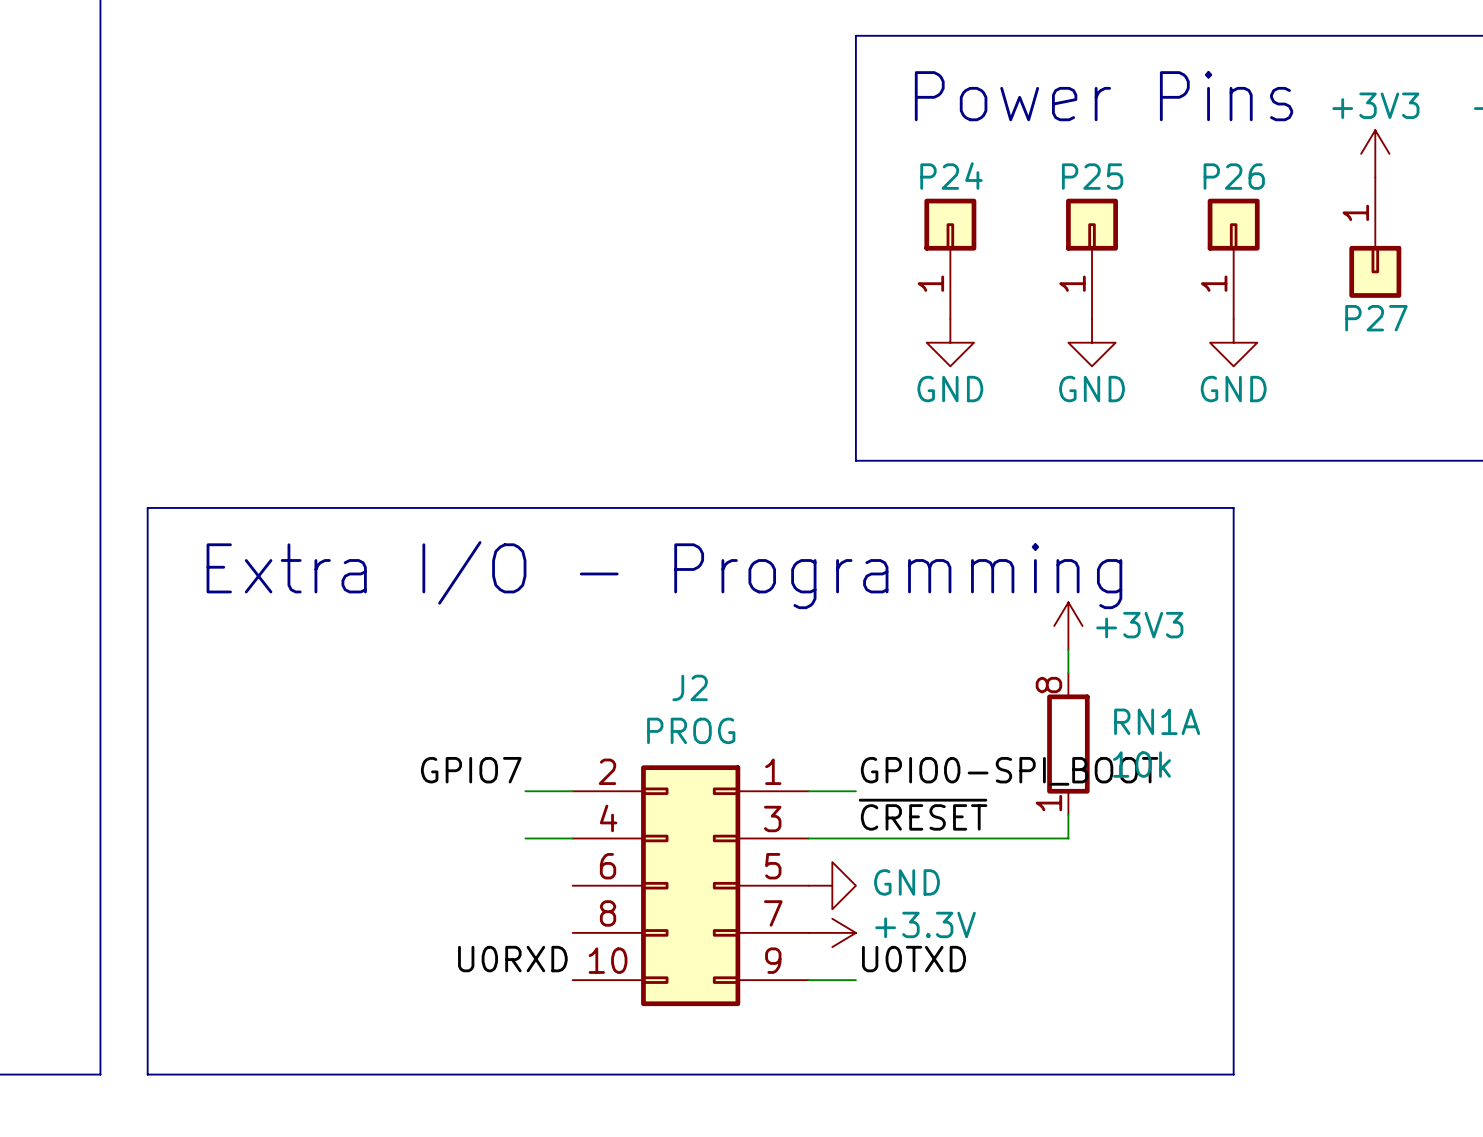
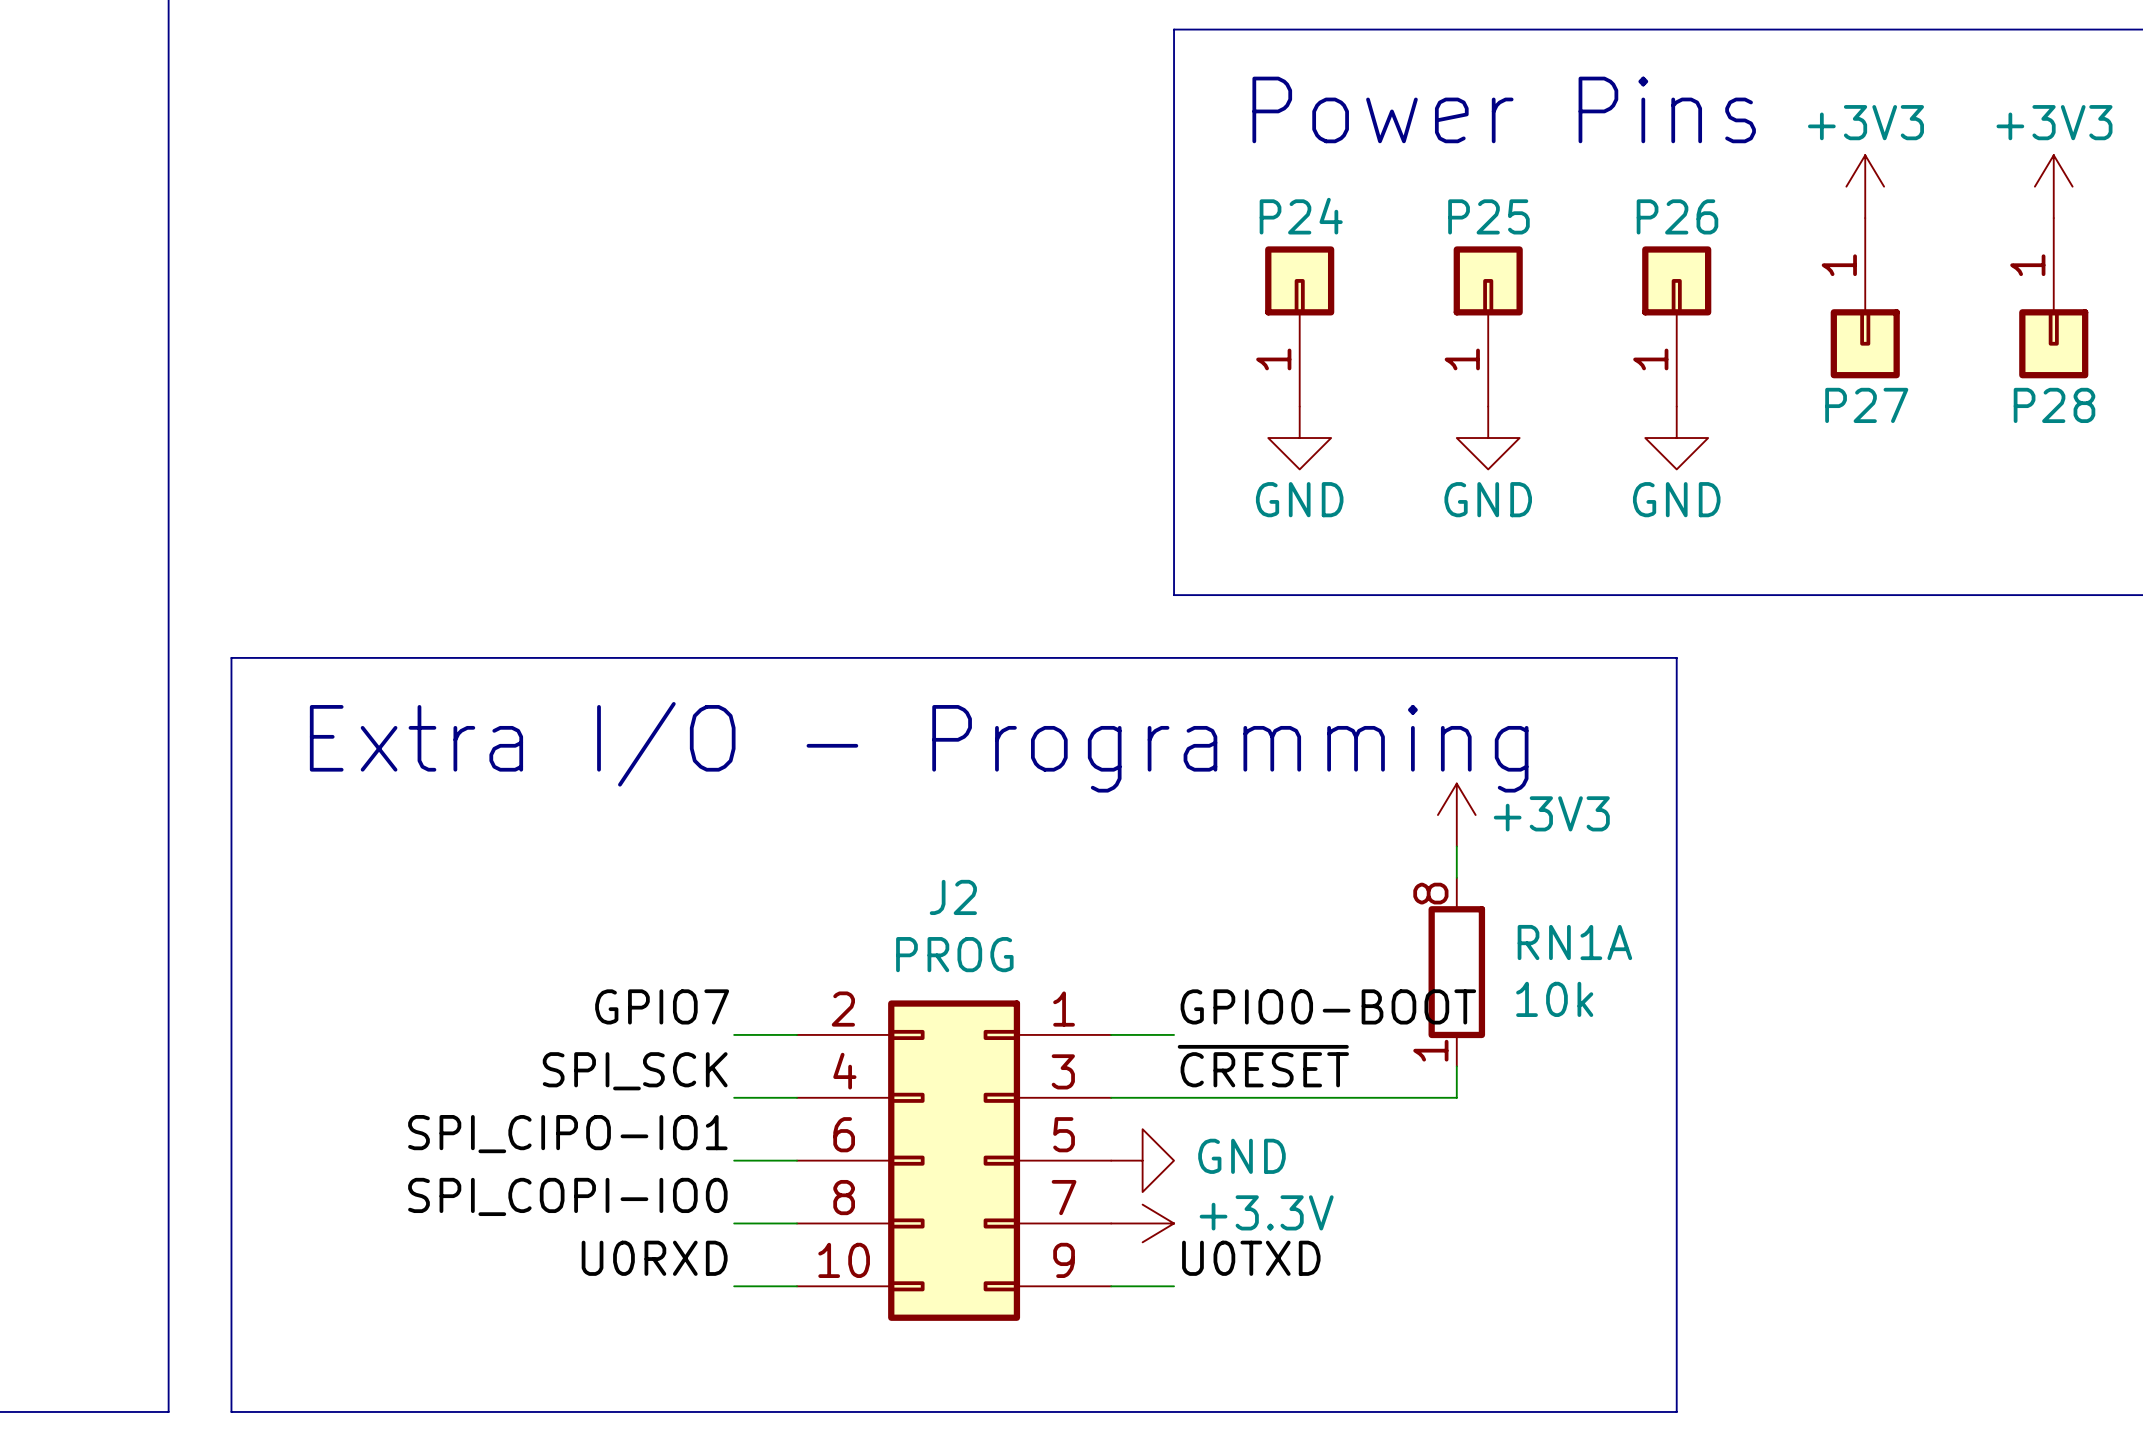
label: GPIO0-SPI_BOOT (1009, 771) -> GPIO0-BOOT (1328, 1006)
label: none -> SPI_SCK (635, 1071)
label: none -> SPI_CIPO-IO1 (567, 1134)
wire: none -> (734, 1160) (797, 1160)
label: none -> SPI_COPI-IO0 (567, 1196)
wire: none -> (734, 1223) (797, 1223)
label position: U0RXD (512, 959) -> U0RXD (654, 1258)
wire: none -> (734, 1286) (797, 1286)

